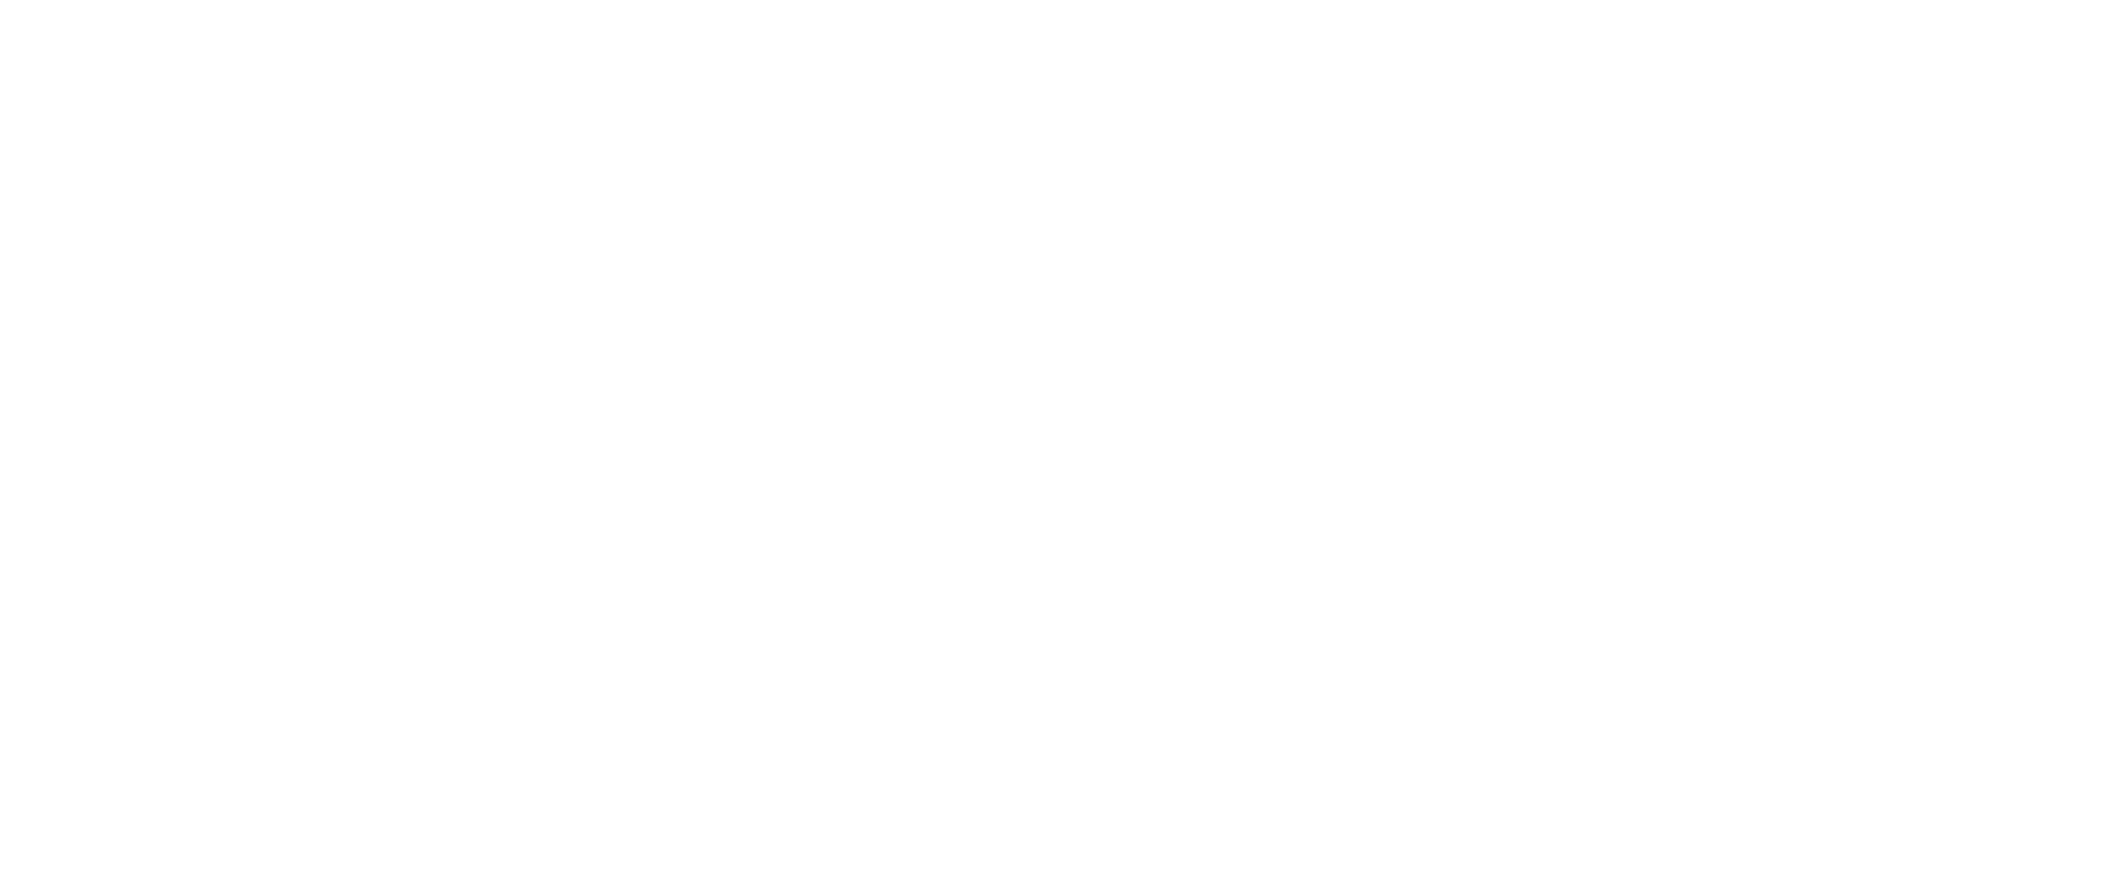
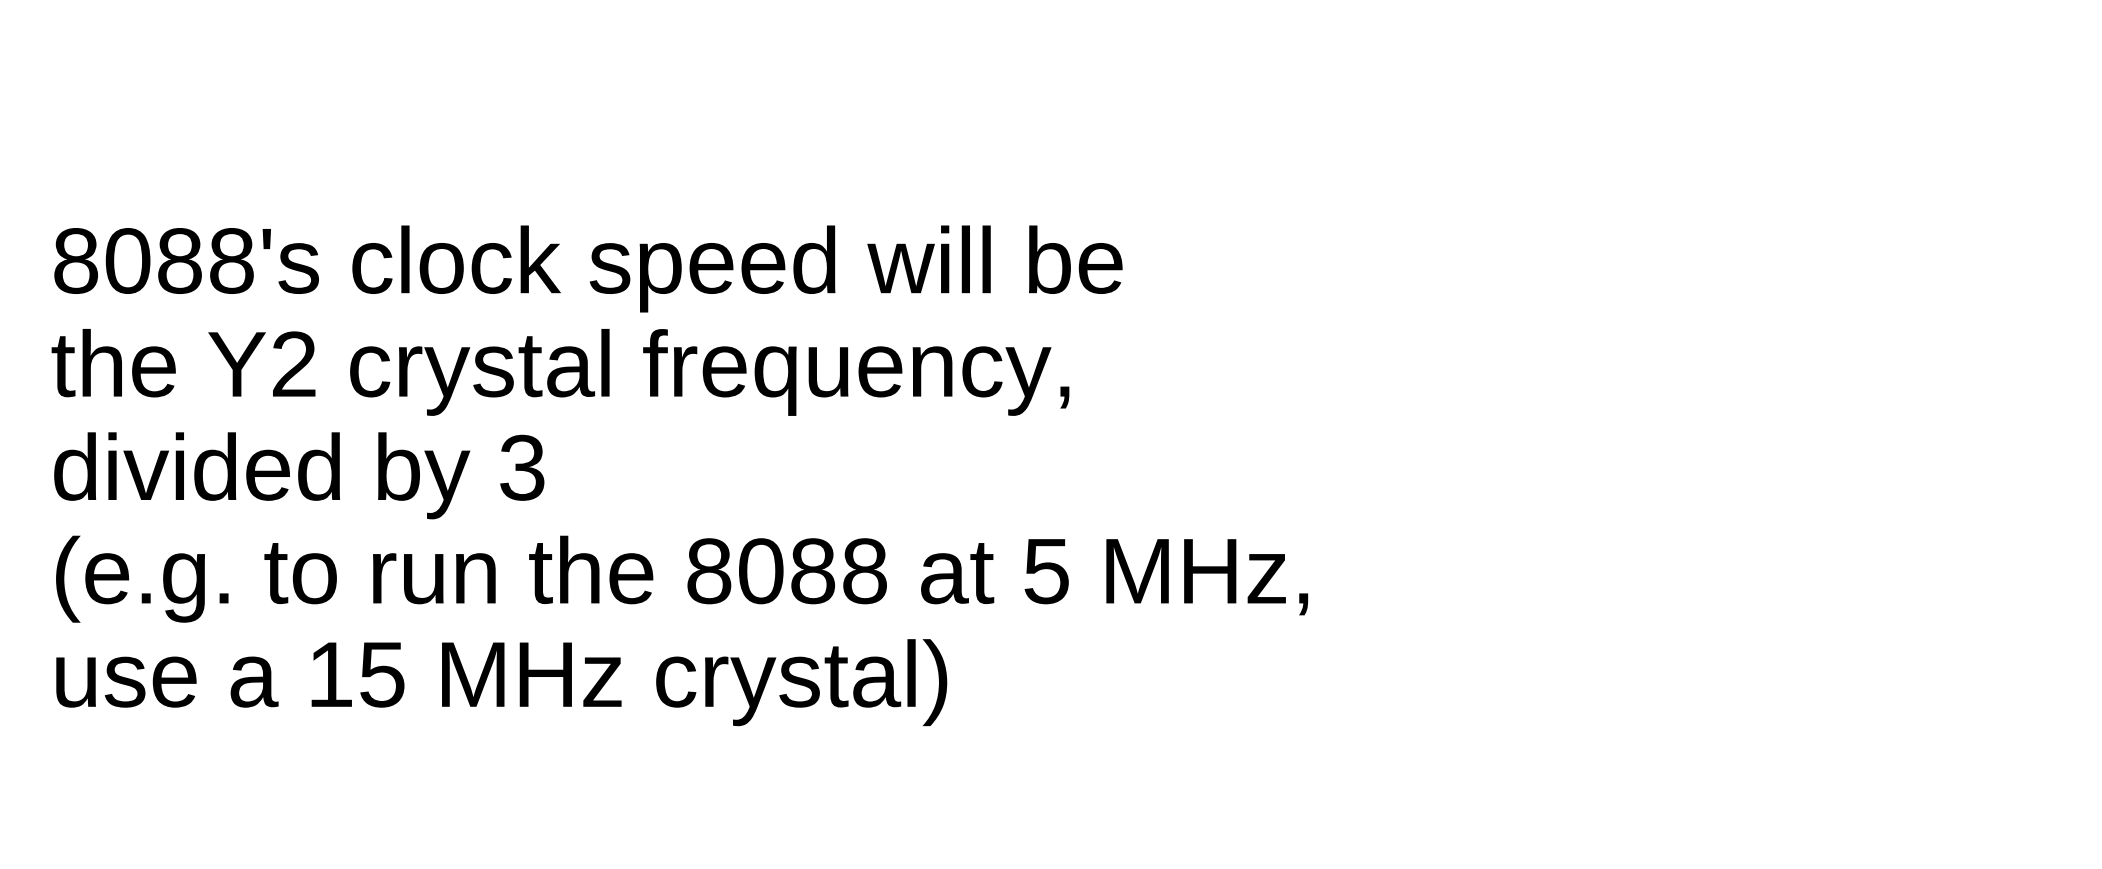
text: none -> 8088's clock speed will be (588, 269)
text: none -> the Y2 crystal frequency, (560, 372)
text: none -> divided by 3 (299, 475)
text: none -> (e.g. to run the 8088 at 5 MHz, (682, 579)
text: none -> use a 15 MHz crystal) (501, 682)

